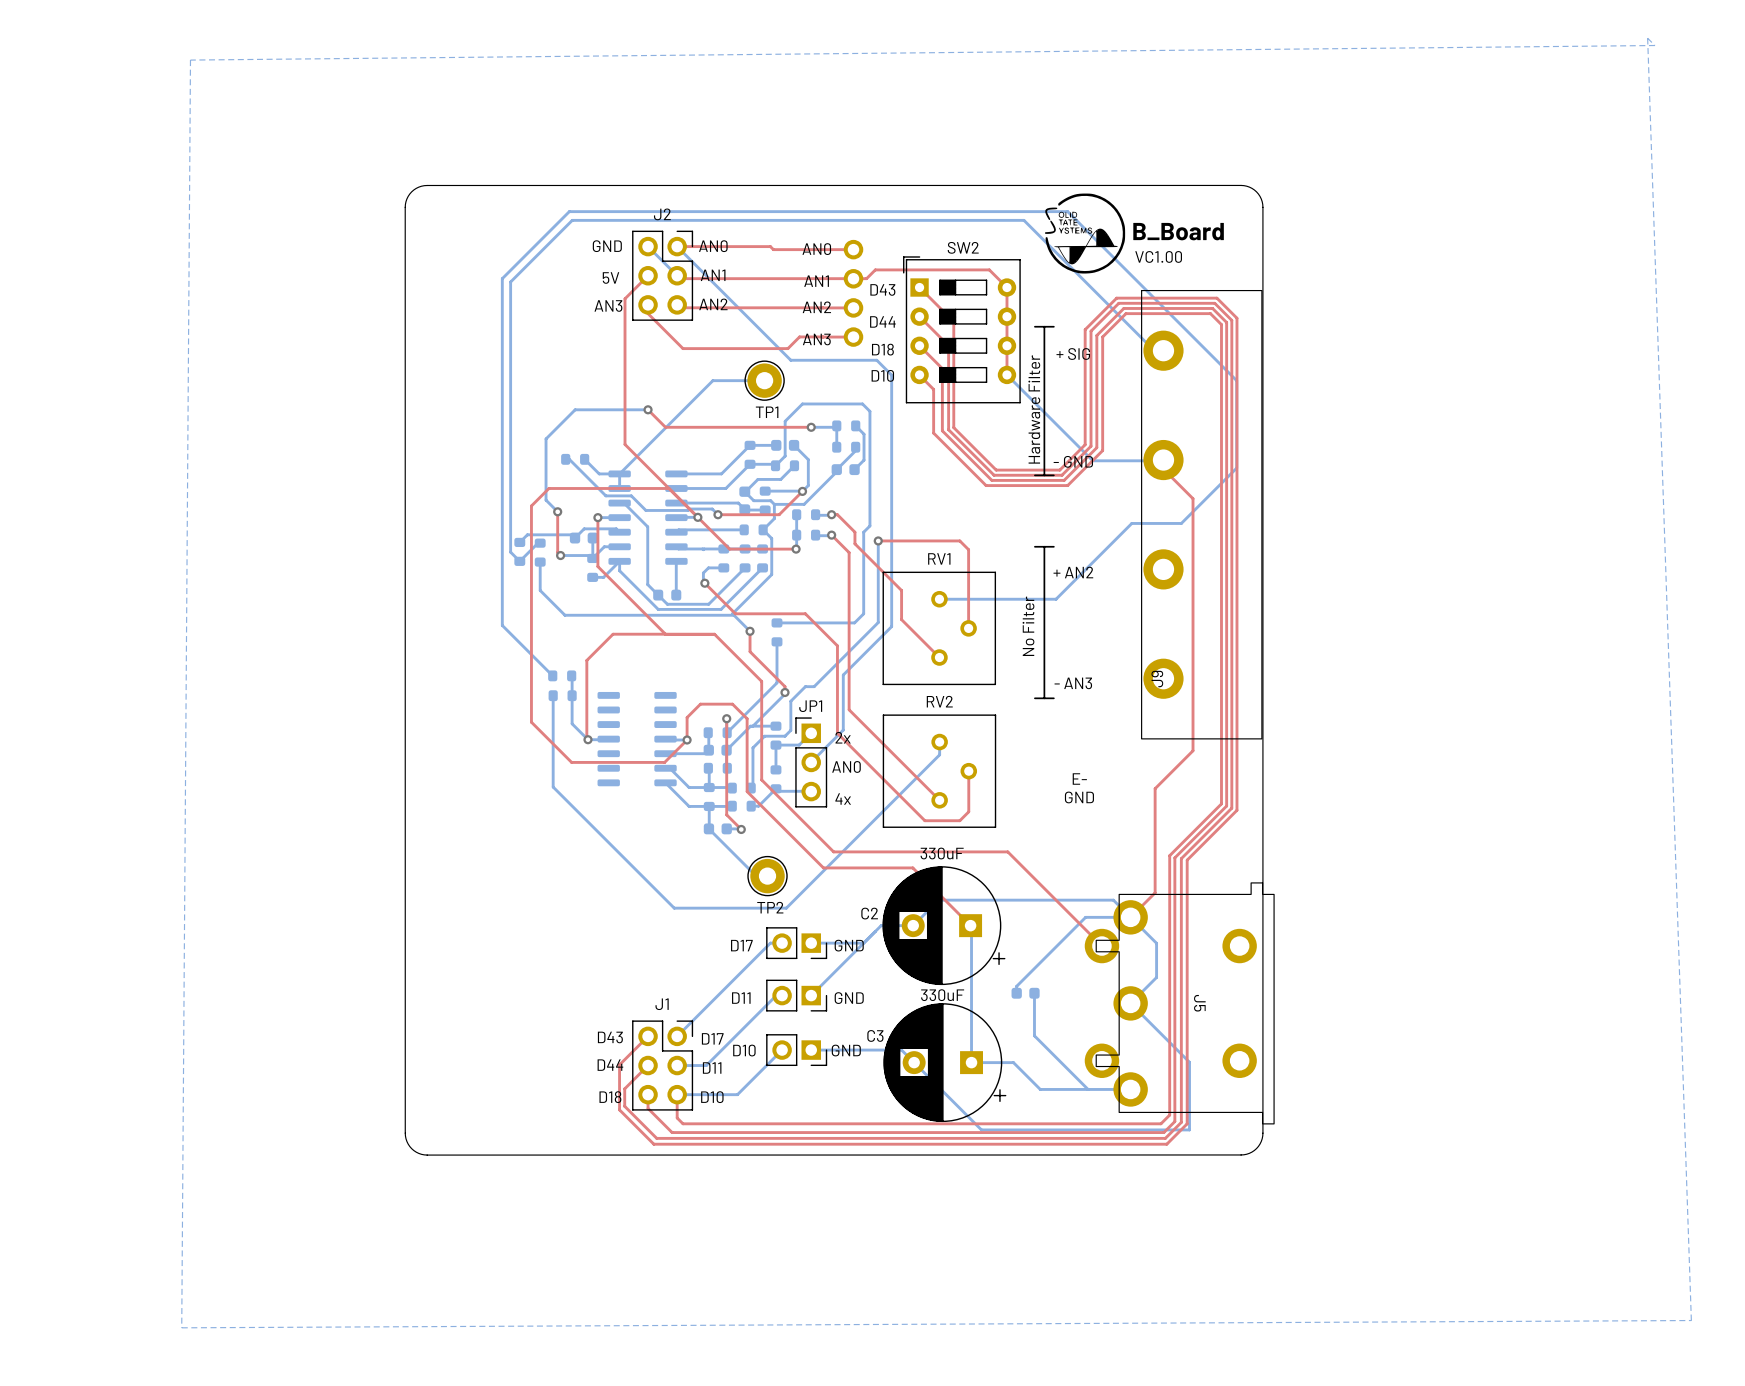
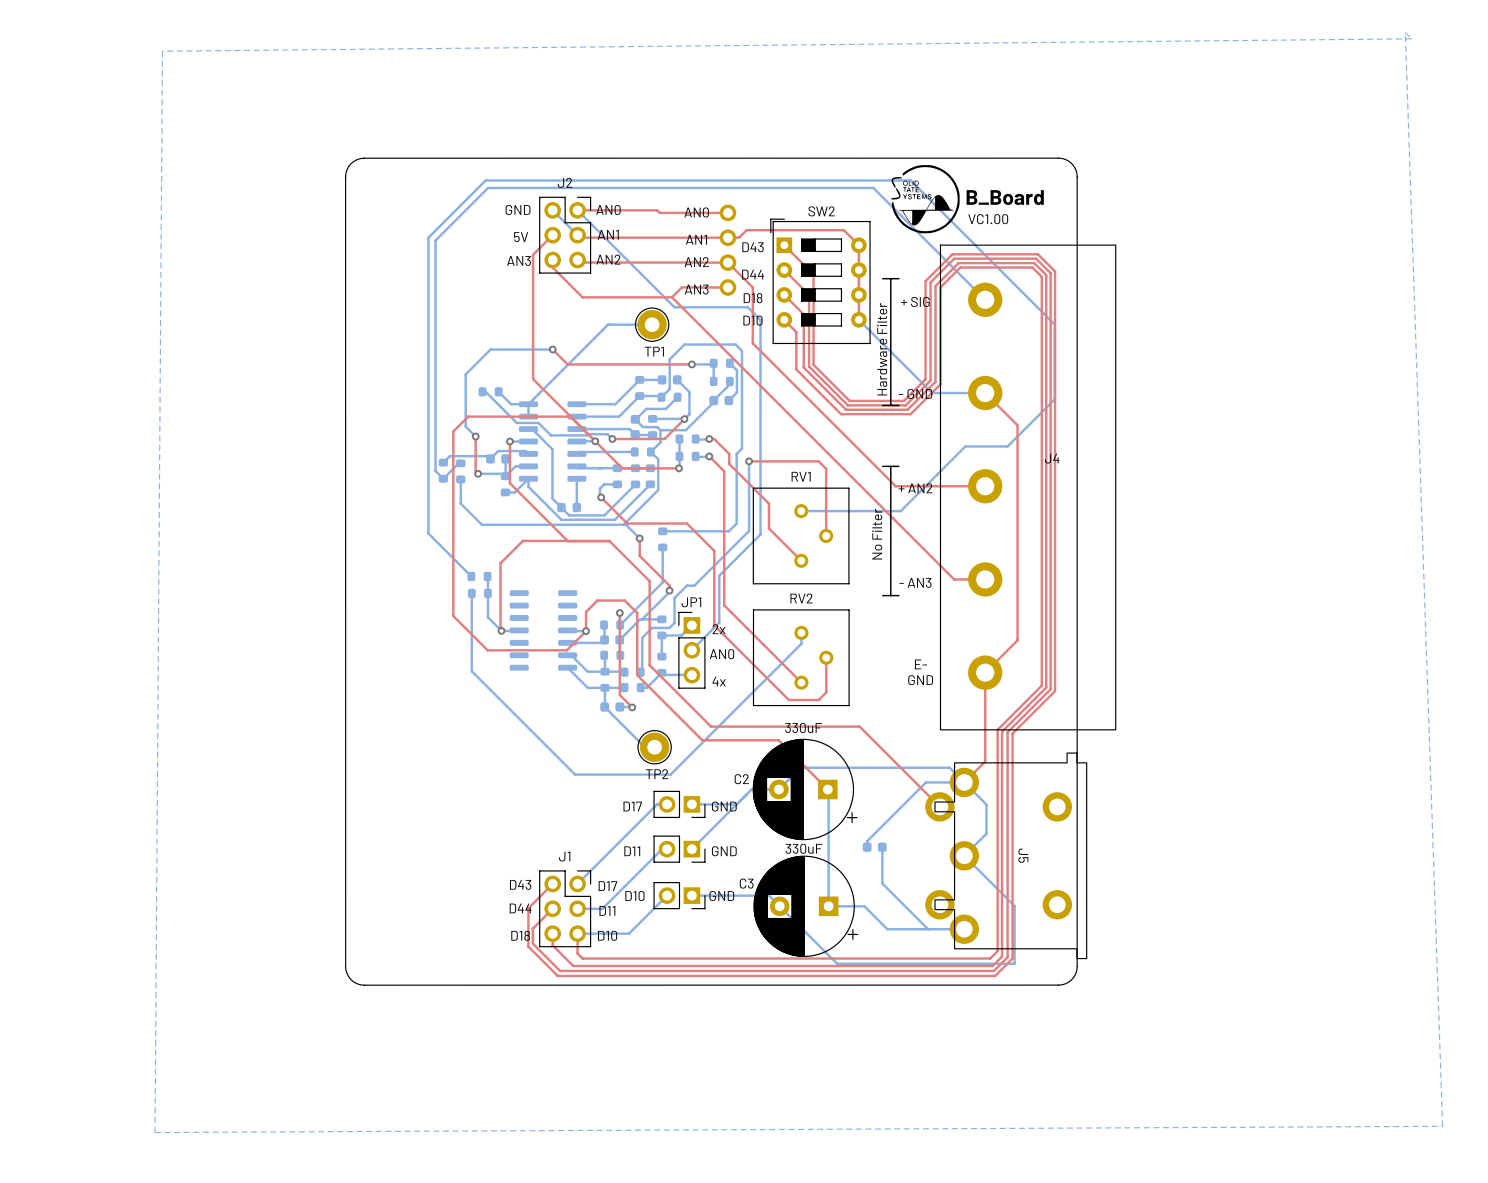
top track: none -> (727, 262) (752, 287)
top track: none -> (752, 287) (752, 343) (895, 486) (985, 486)
top track: none -> (672, 297) (954, 579) (985, 579)
J9: (1201, 514) -> none
J4: none -> (1028, 487)

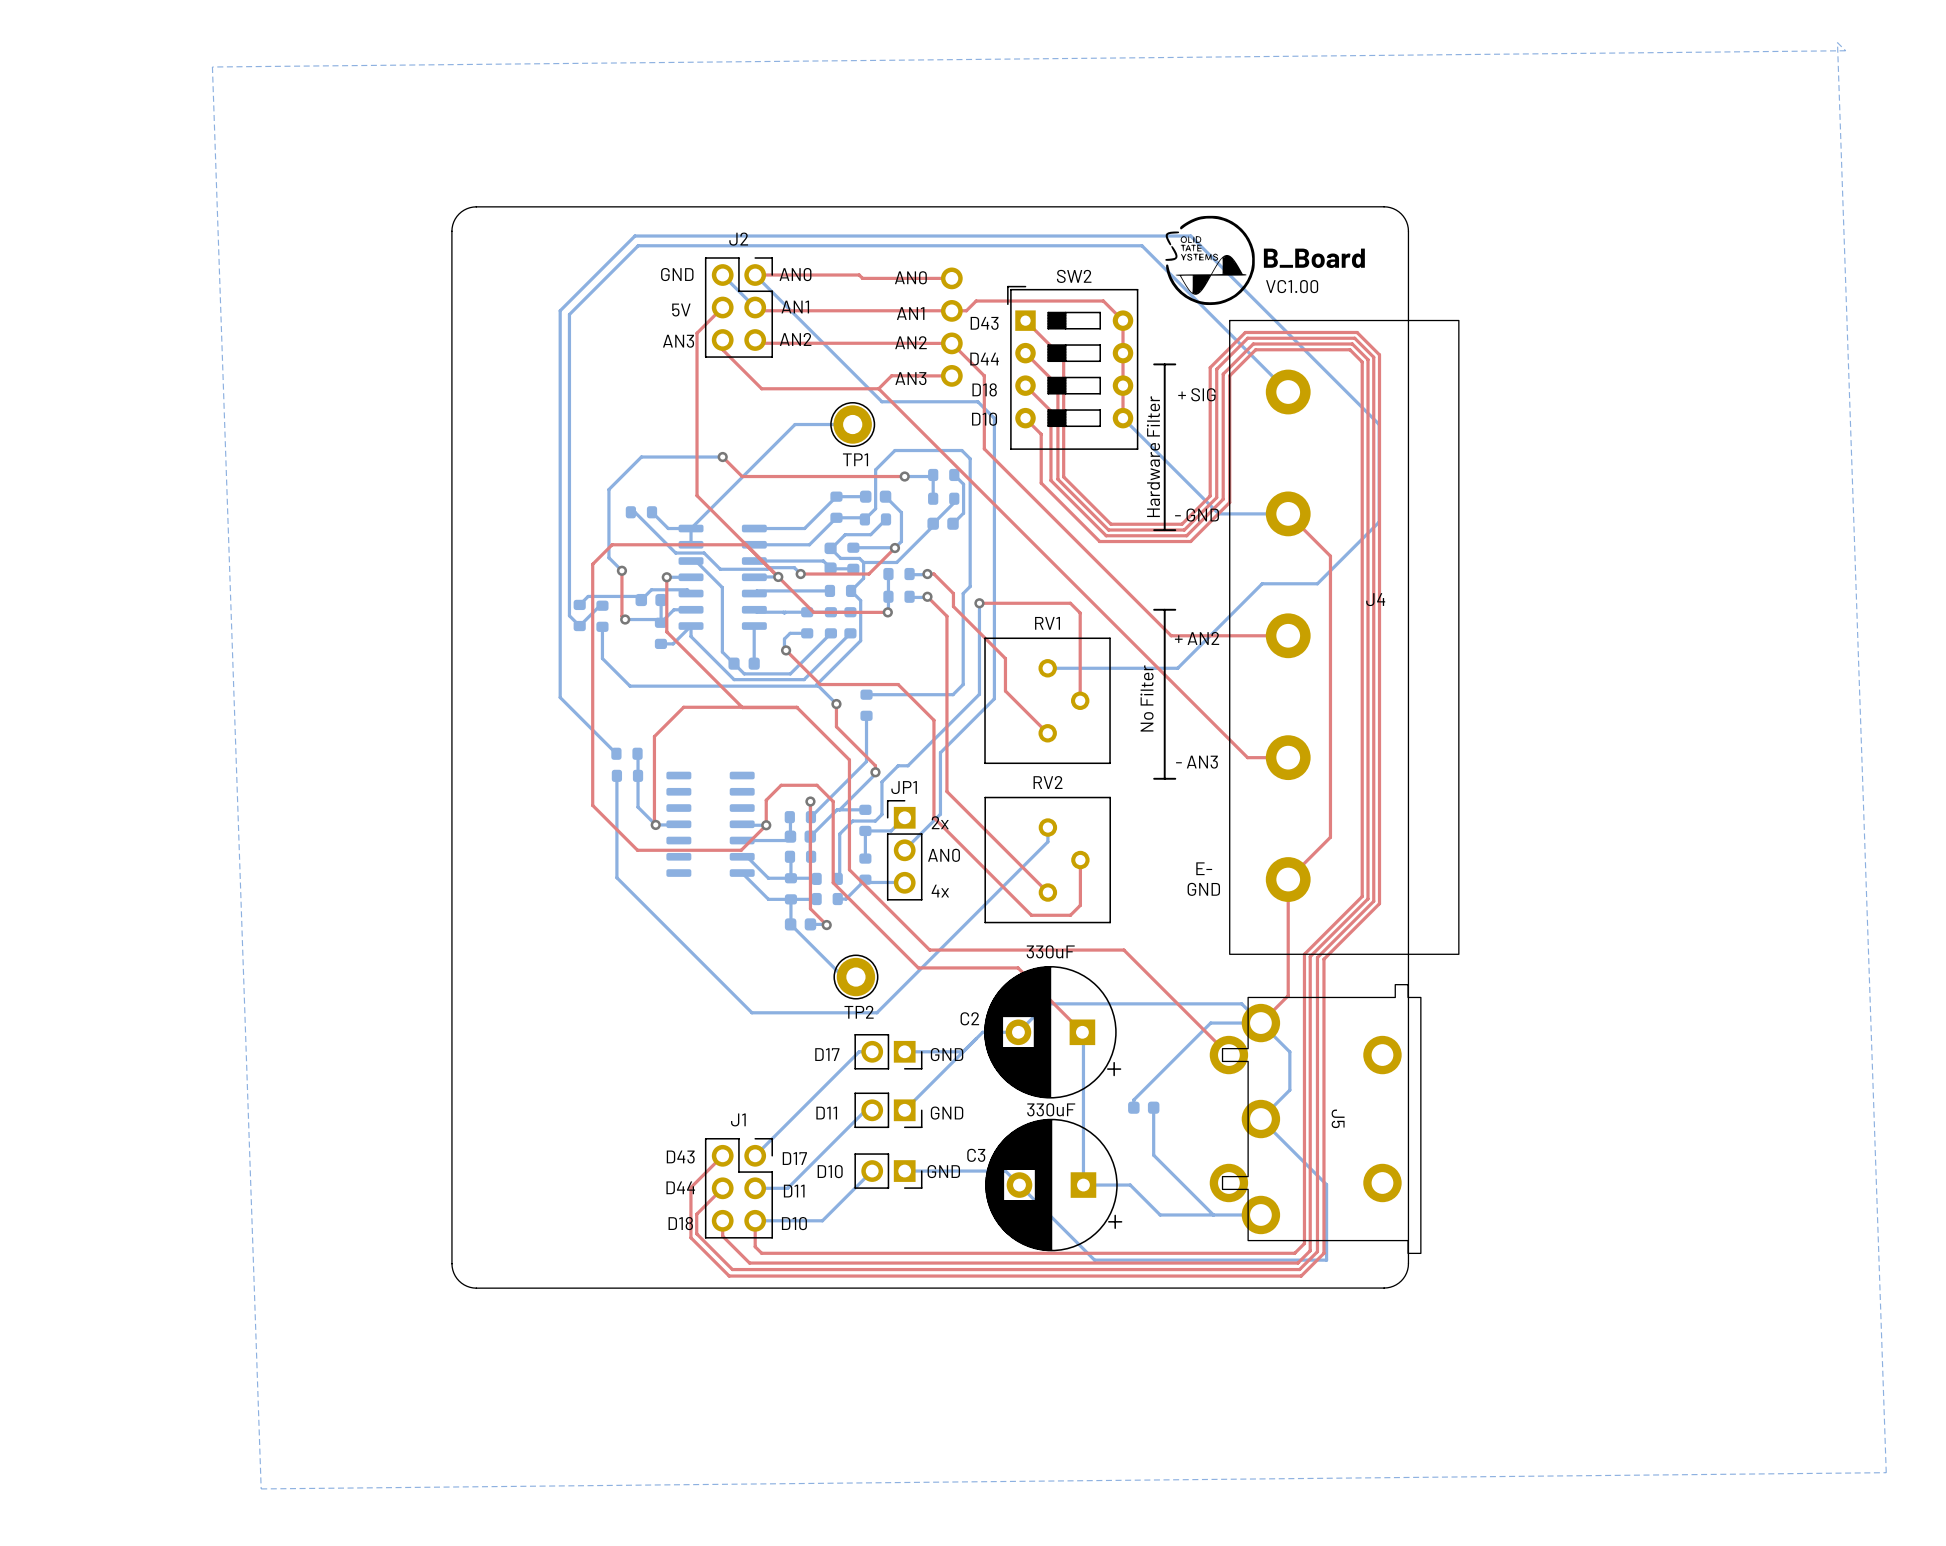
bottom zone outline: (162, 51) (155, 1132) (1442, 1126) -> (212, 67) (261, 1488) (1886, 1472)

